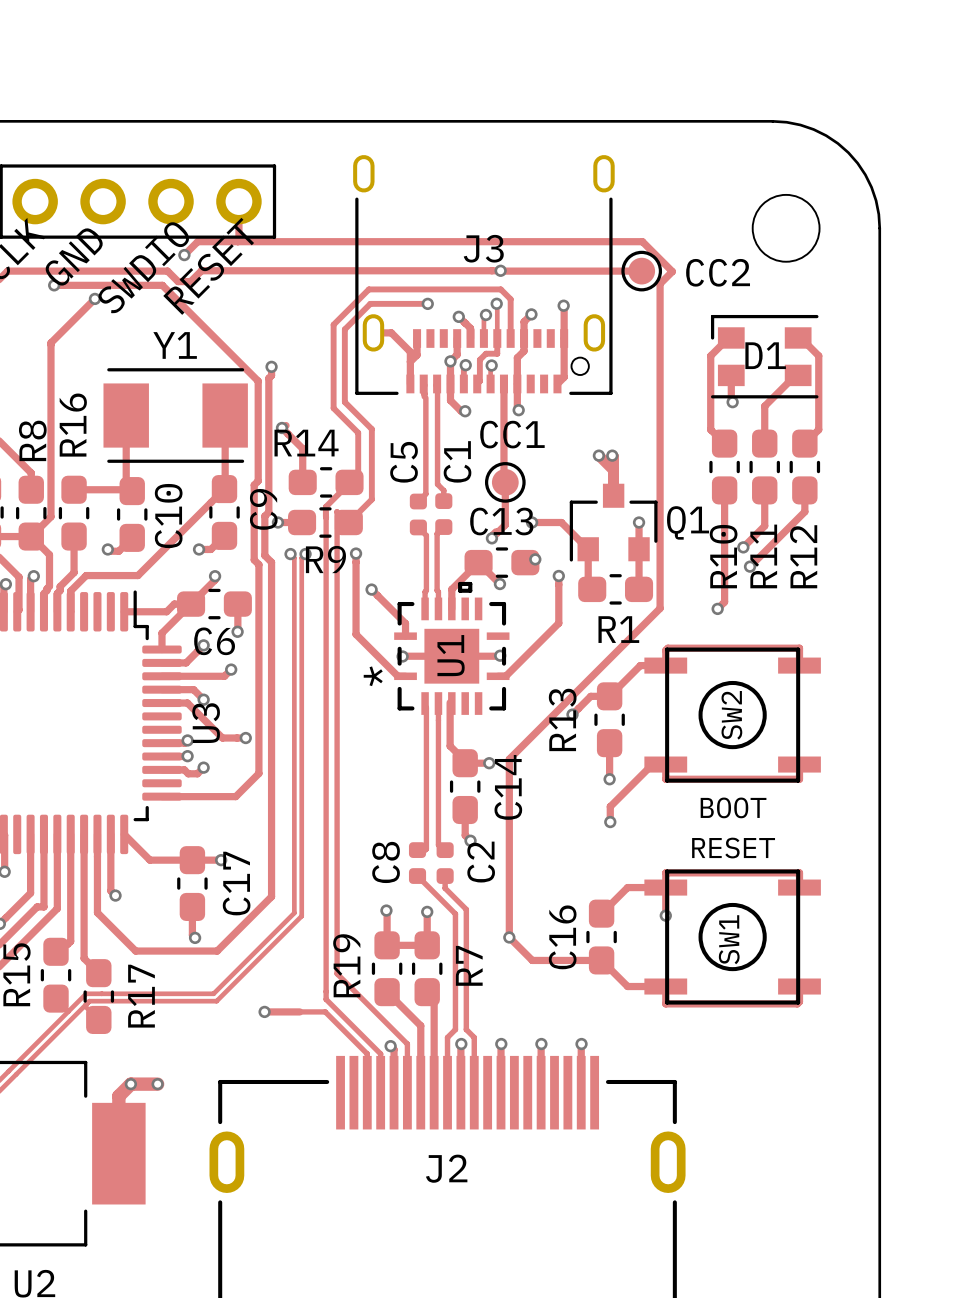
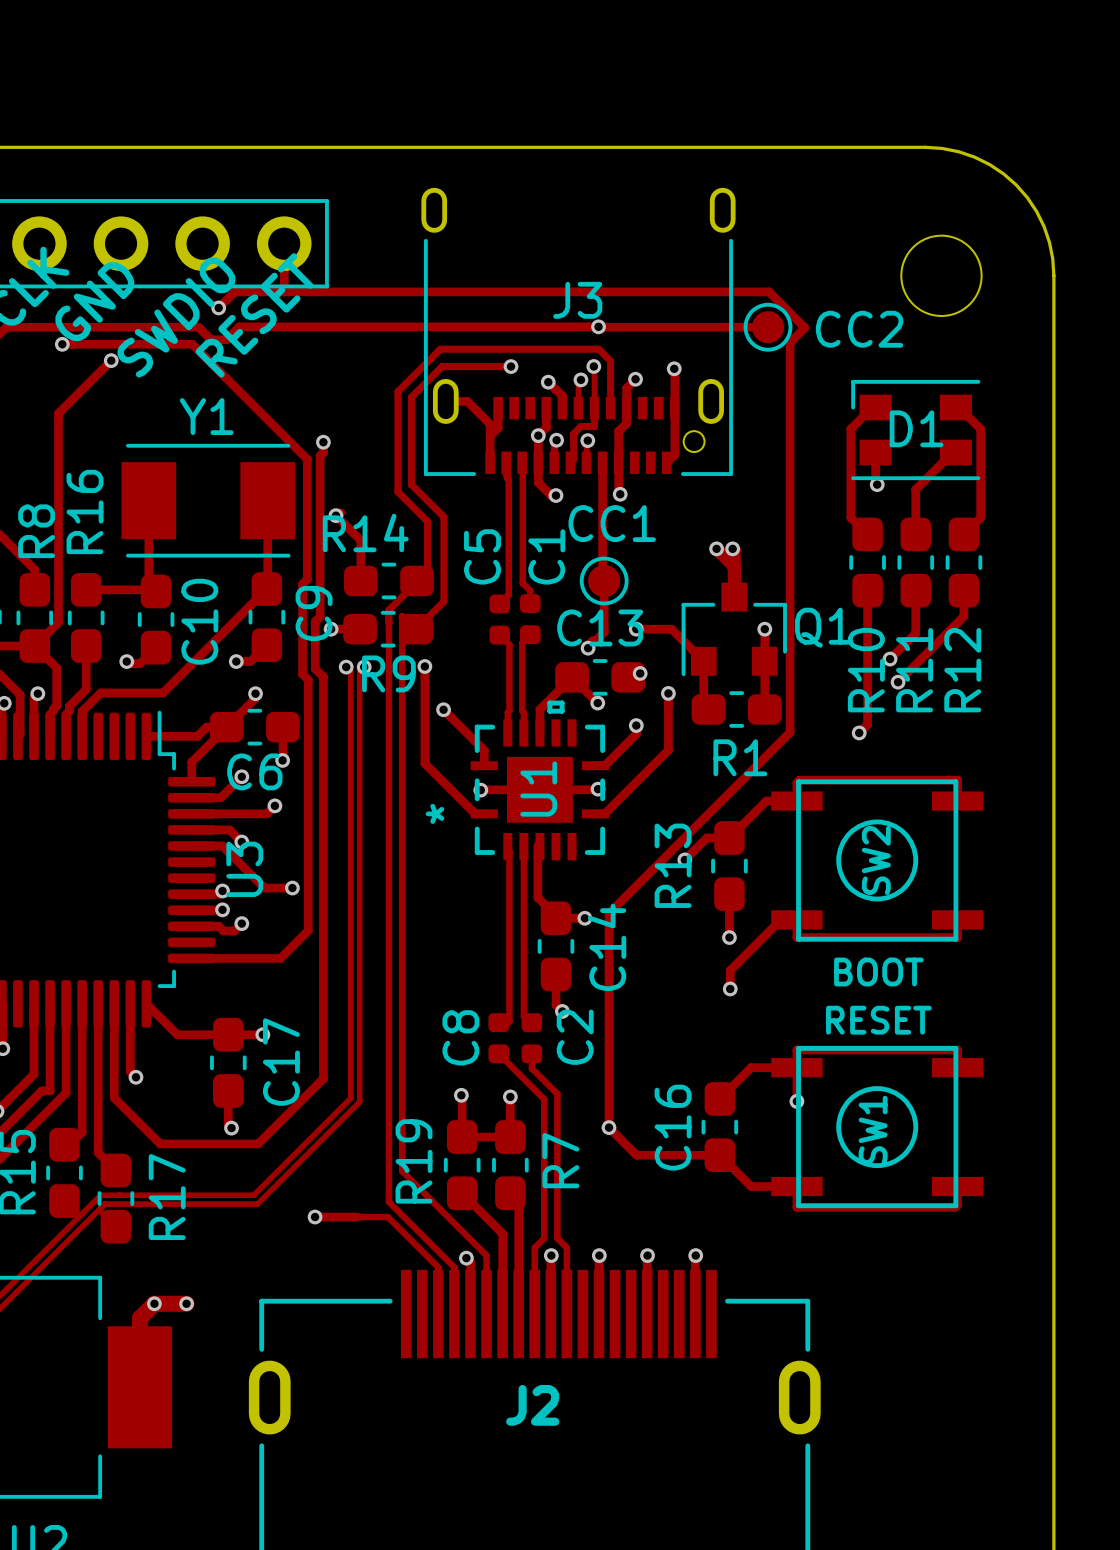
track: none -> (636, 725) (636, 734) (604, 765) (595, 765)
via: none -> (636, 725)

